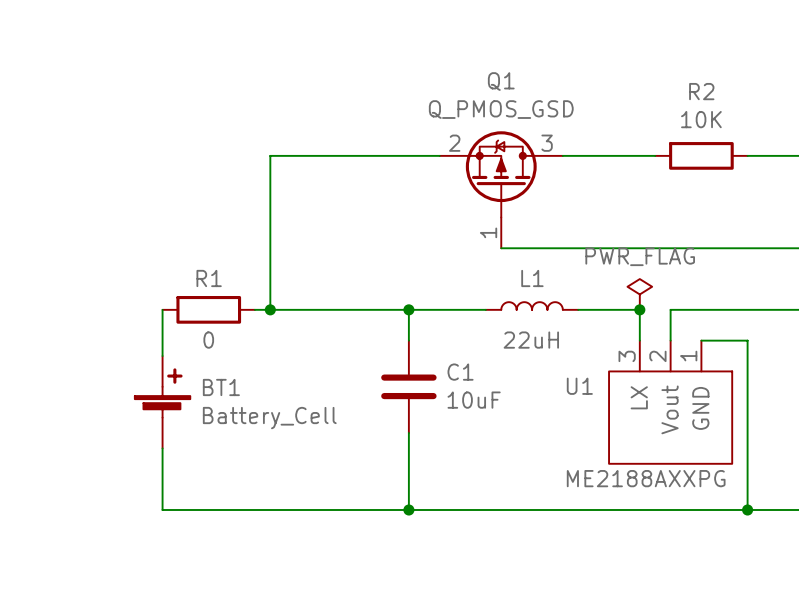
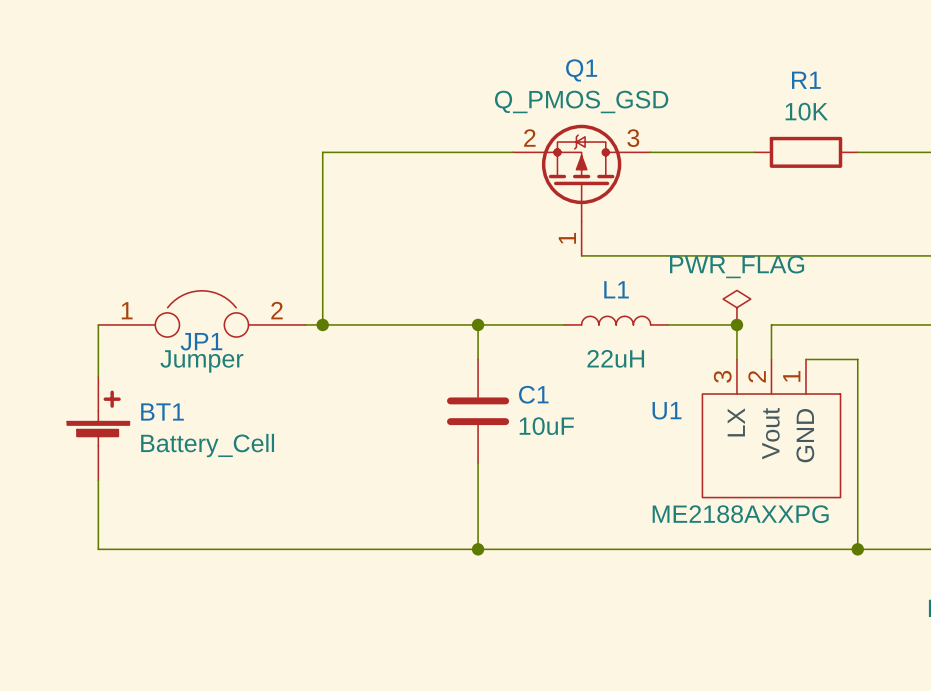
R2 name: R2 (701, 91) -> R1 (806, 80)
JP1: none -> Jumper (201, 313)
wire: (162, 309) (162, 356) -> (98, 324) (98, 376)
R1: 0 (208, 309) -> none
BT1 position: (162, 402) -> (98, 428)
wire: (162, 448) (162, 509) -> (98, 480) (98, 549) (201, 549)

